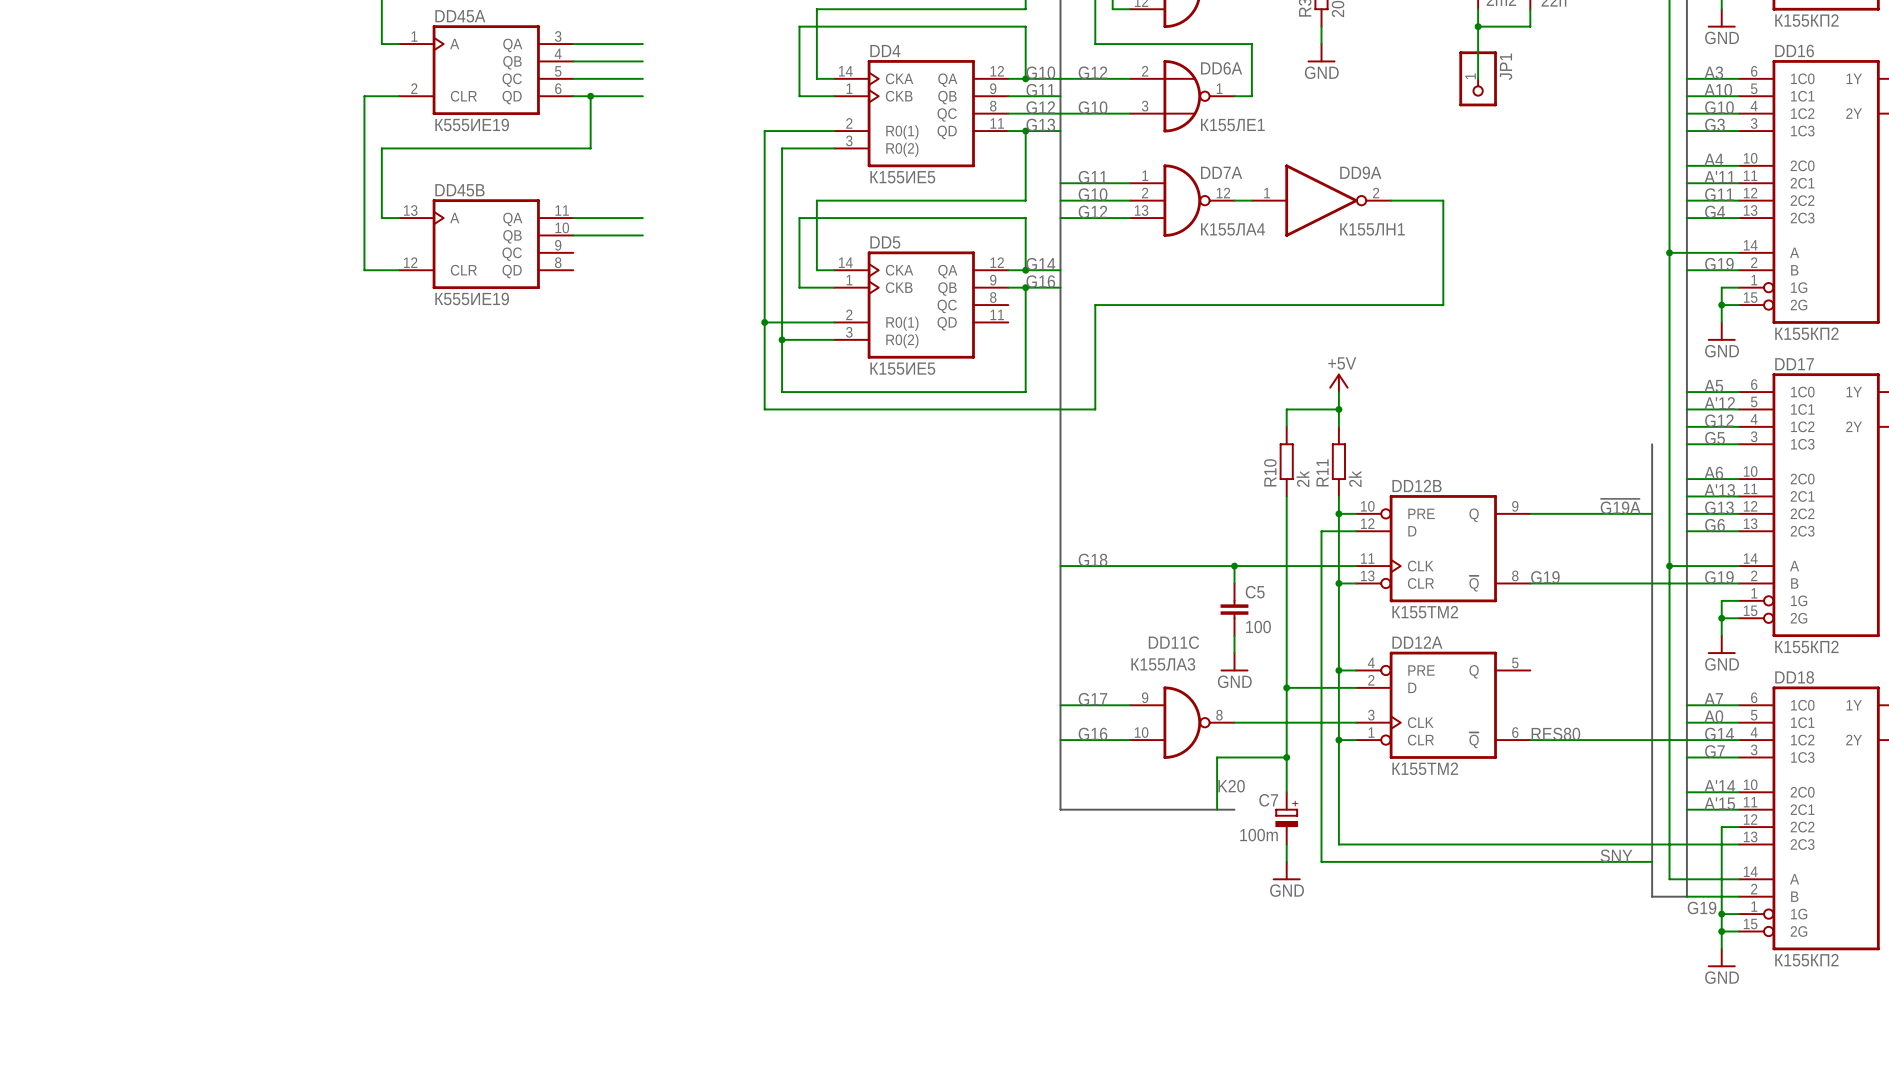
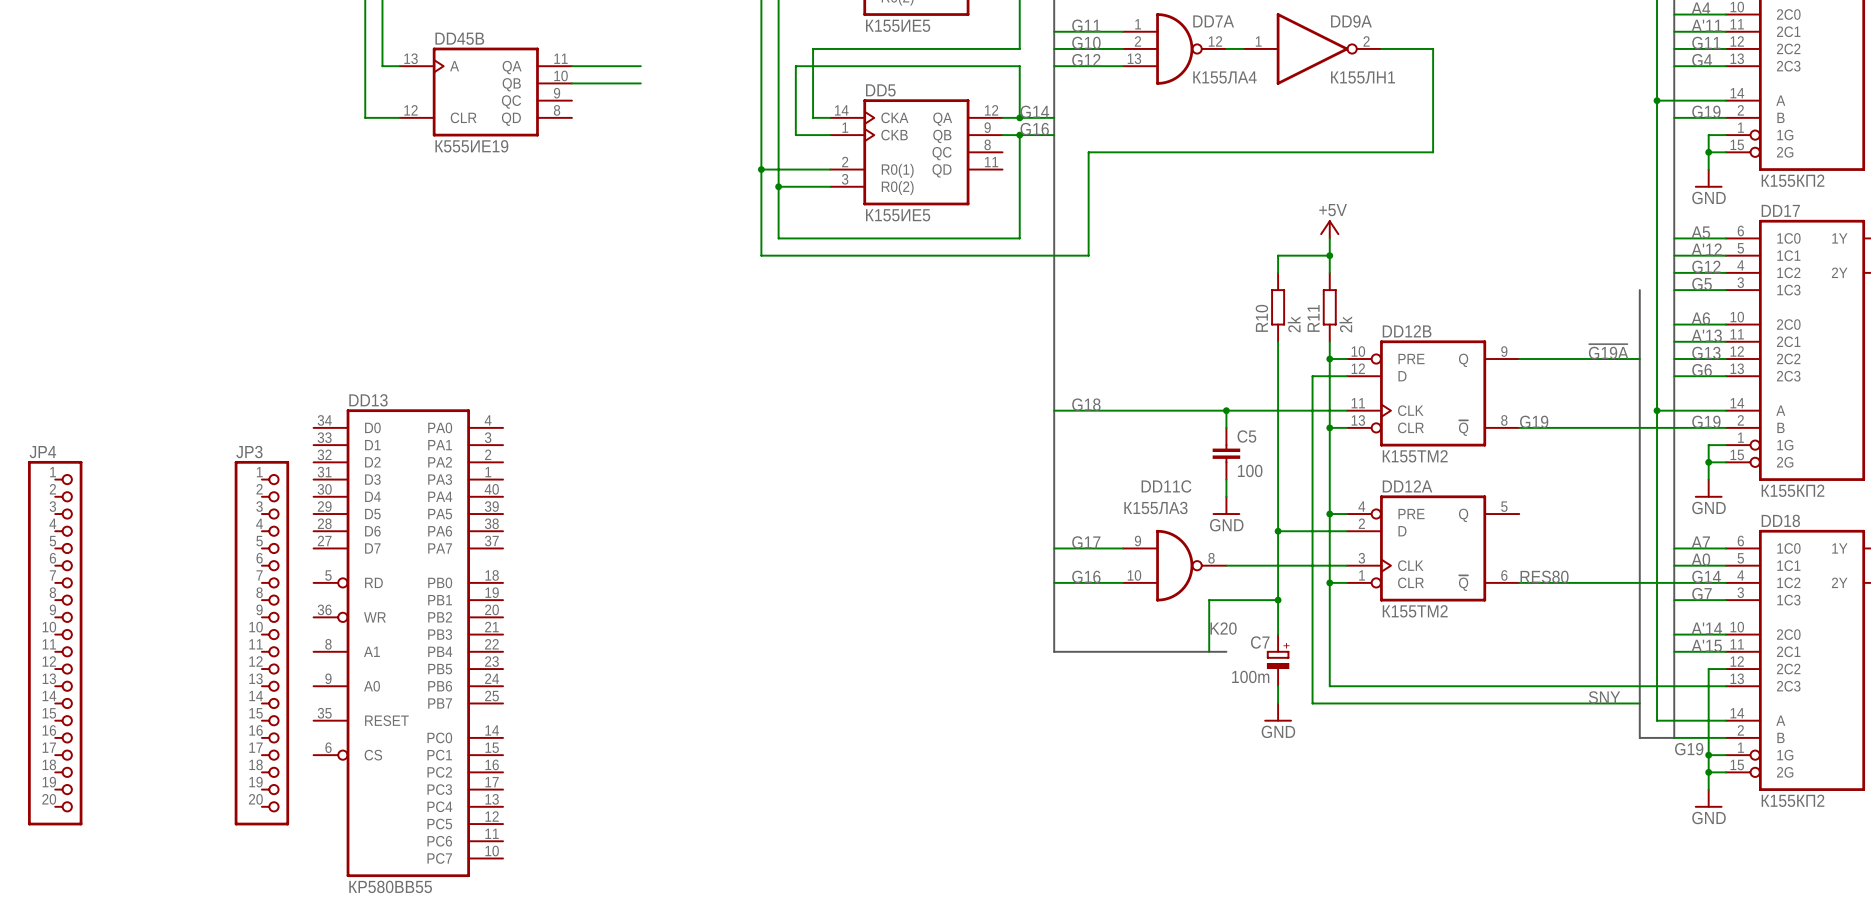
JP4: none -> (55, 643)
JP3: none -> (261, 643)
DD13: none -> КР580ВВ55 (408, 643)

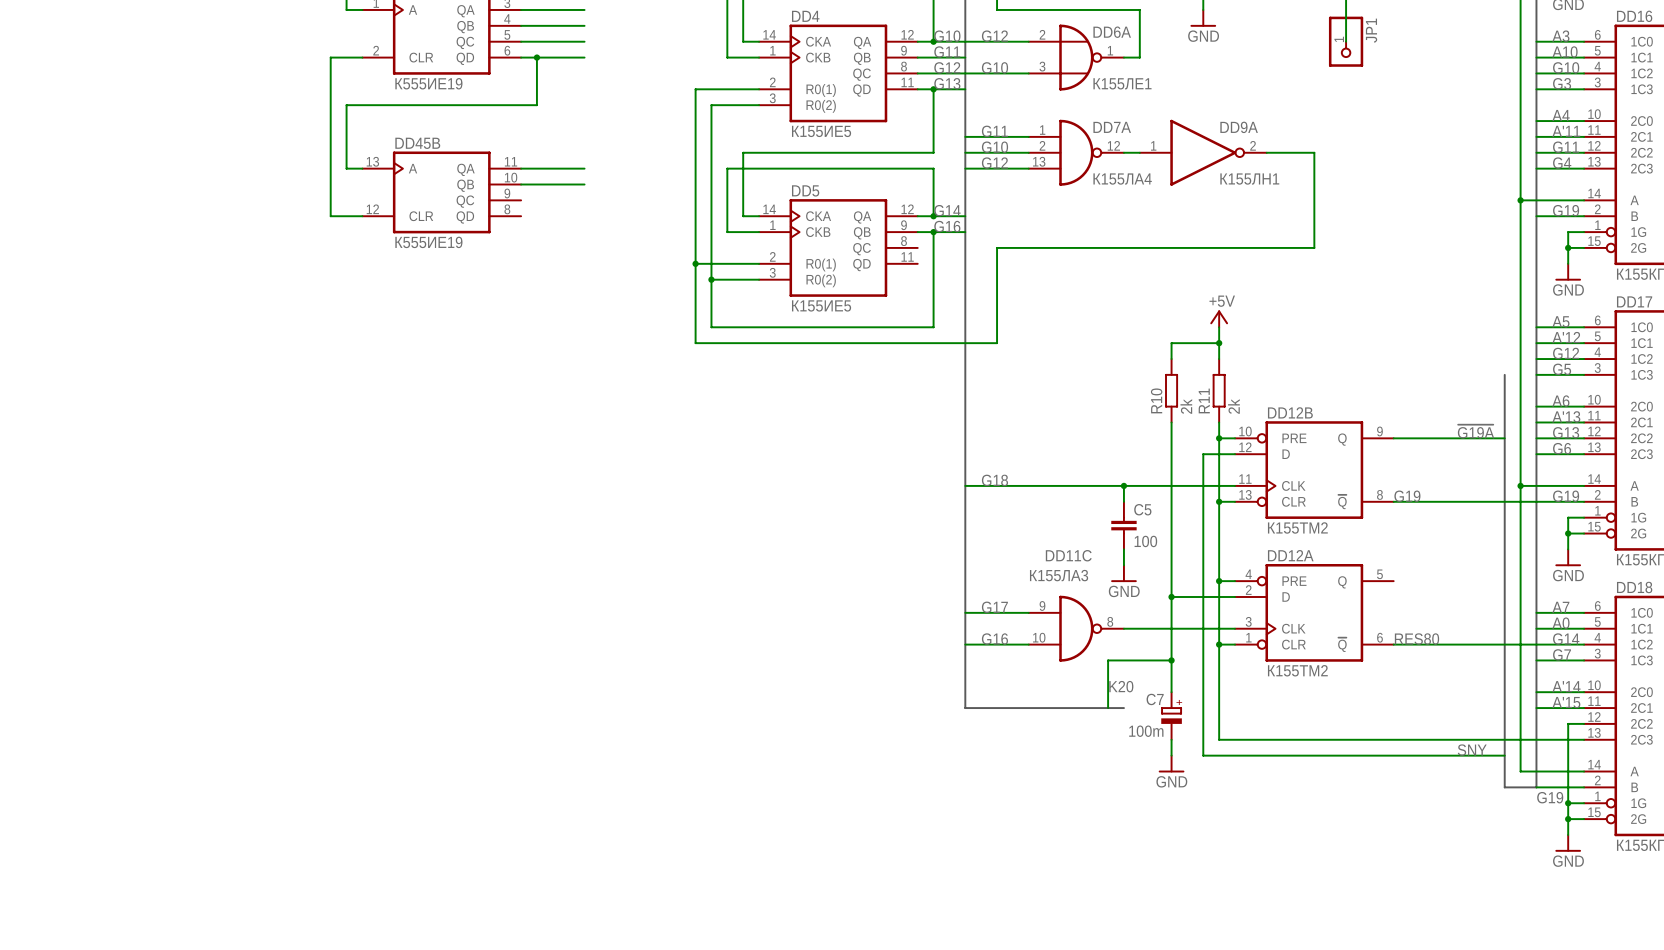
JP4: (55, 643) -> none
JP3: (261, 643) -> none
DD13: КР580ВВ55 (408, 643) -> none

